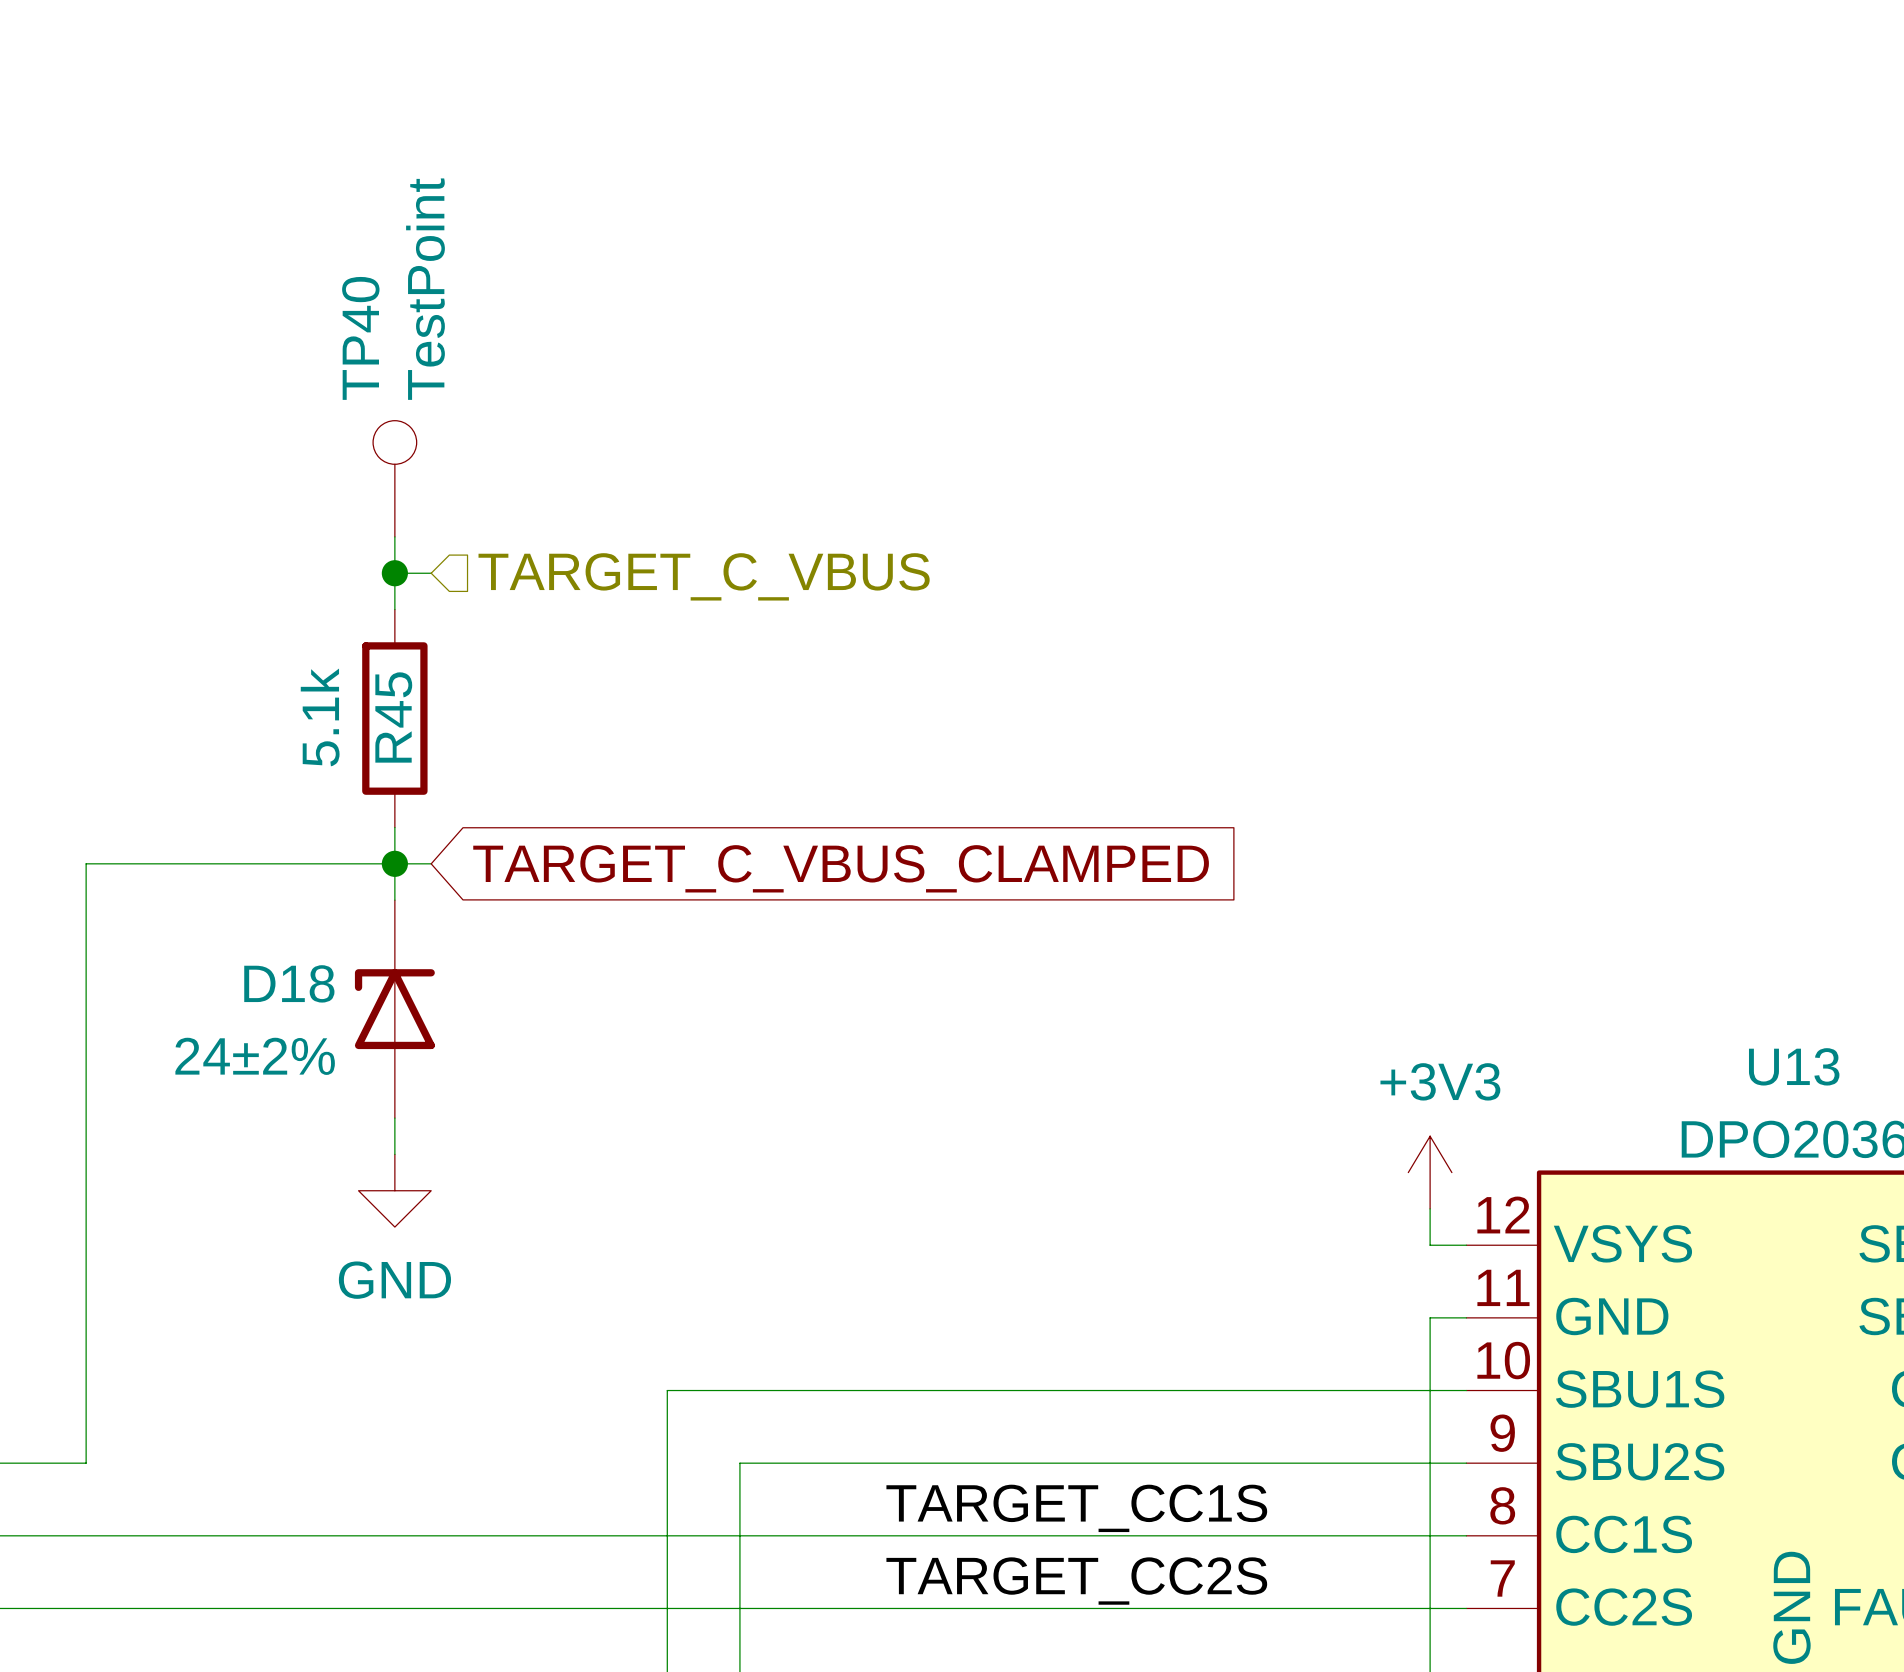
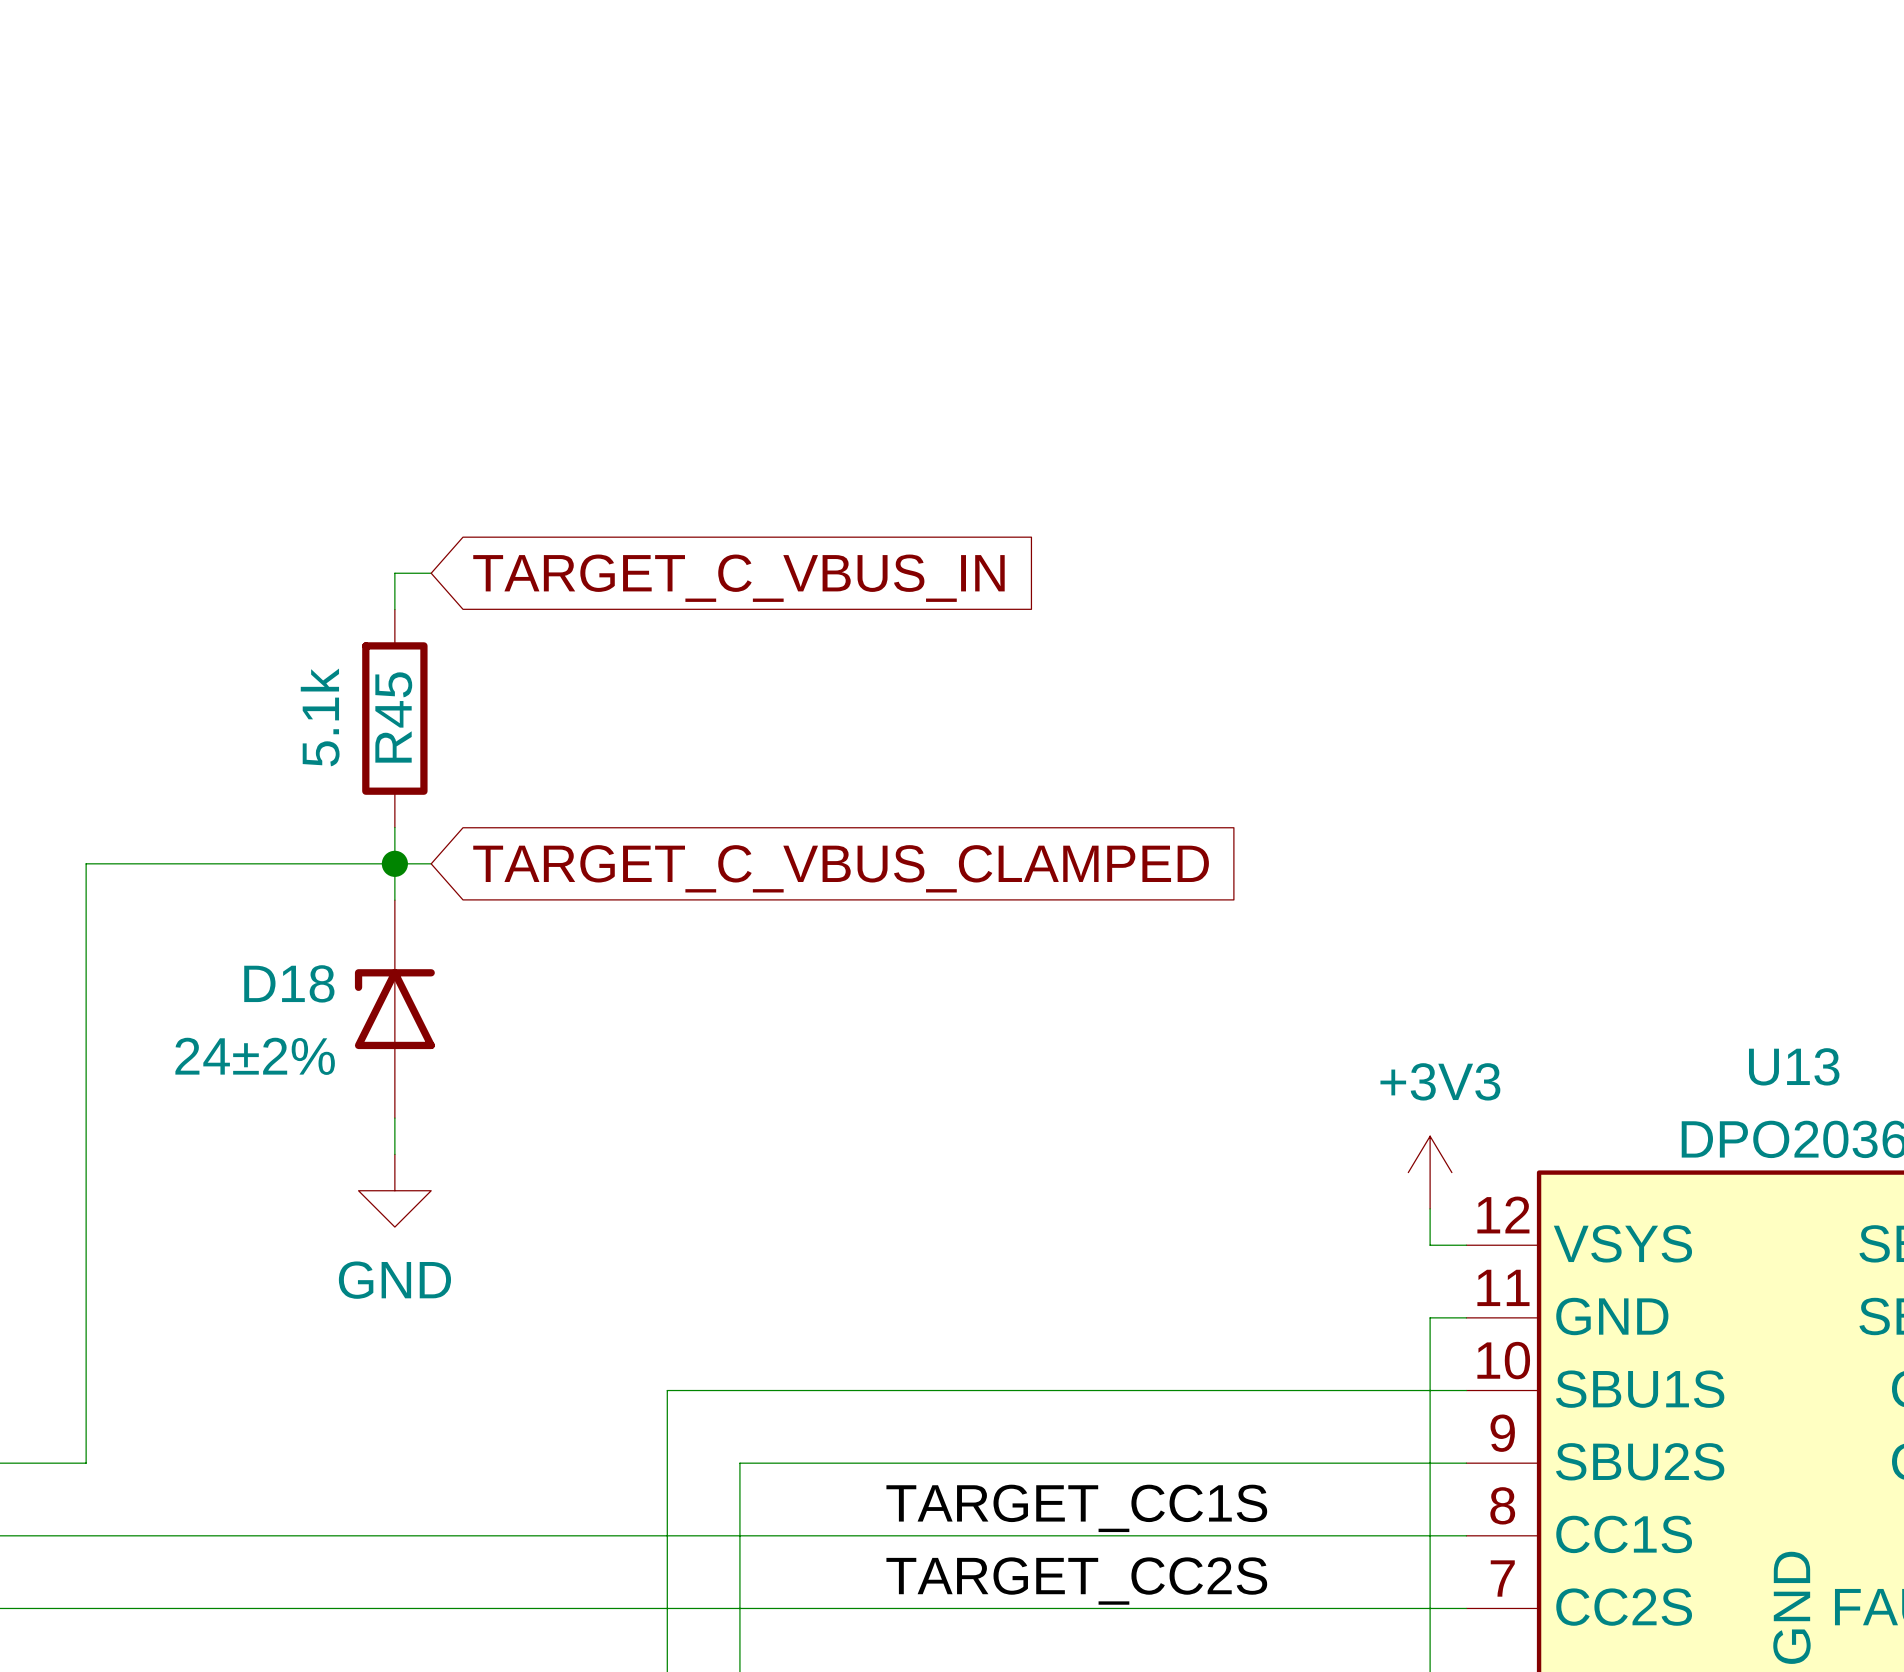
TP40: TestPoint (394, 478) -> none
wire: (394, 536) (394, 573) -> none
junction: (394, 573) -> none
hierarchical label: TARGET_C_VBUS (704, 576) -> none
global label: none -> TARGET_C_VBUS_IN (738, 578)

